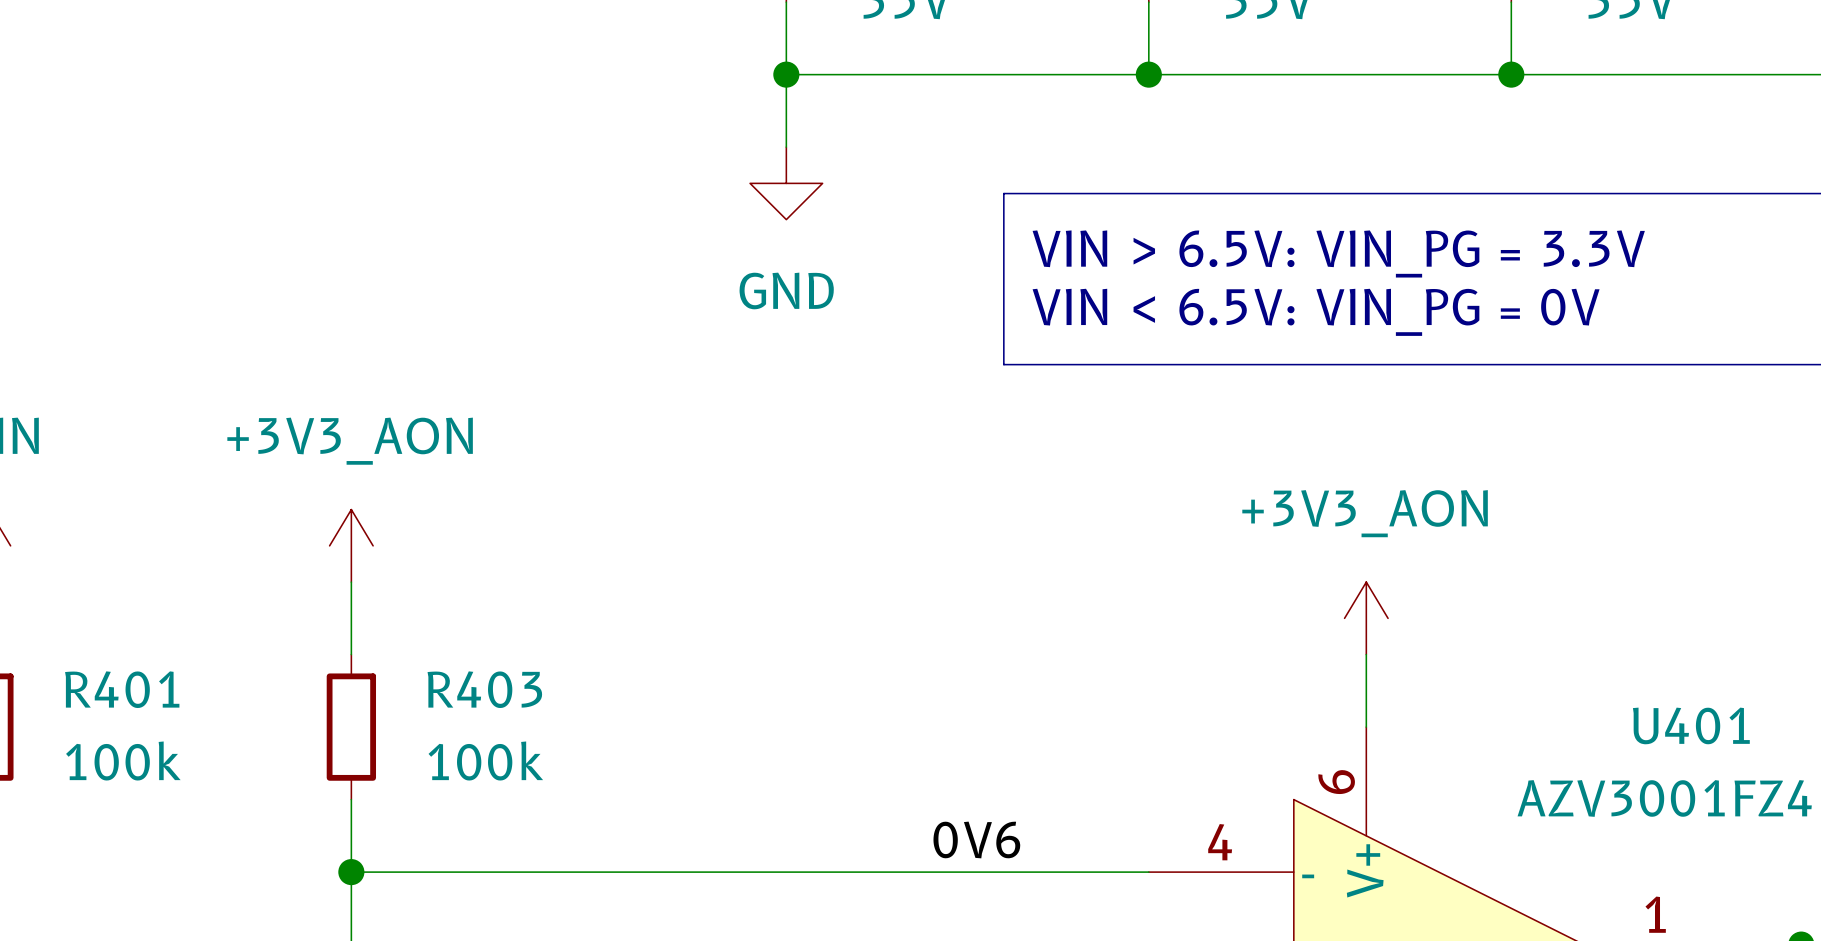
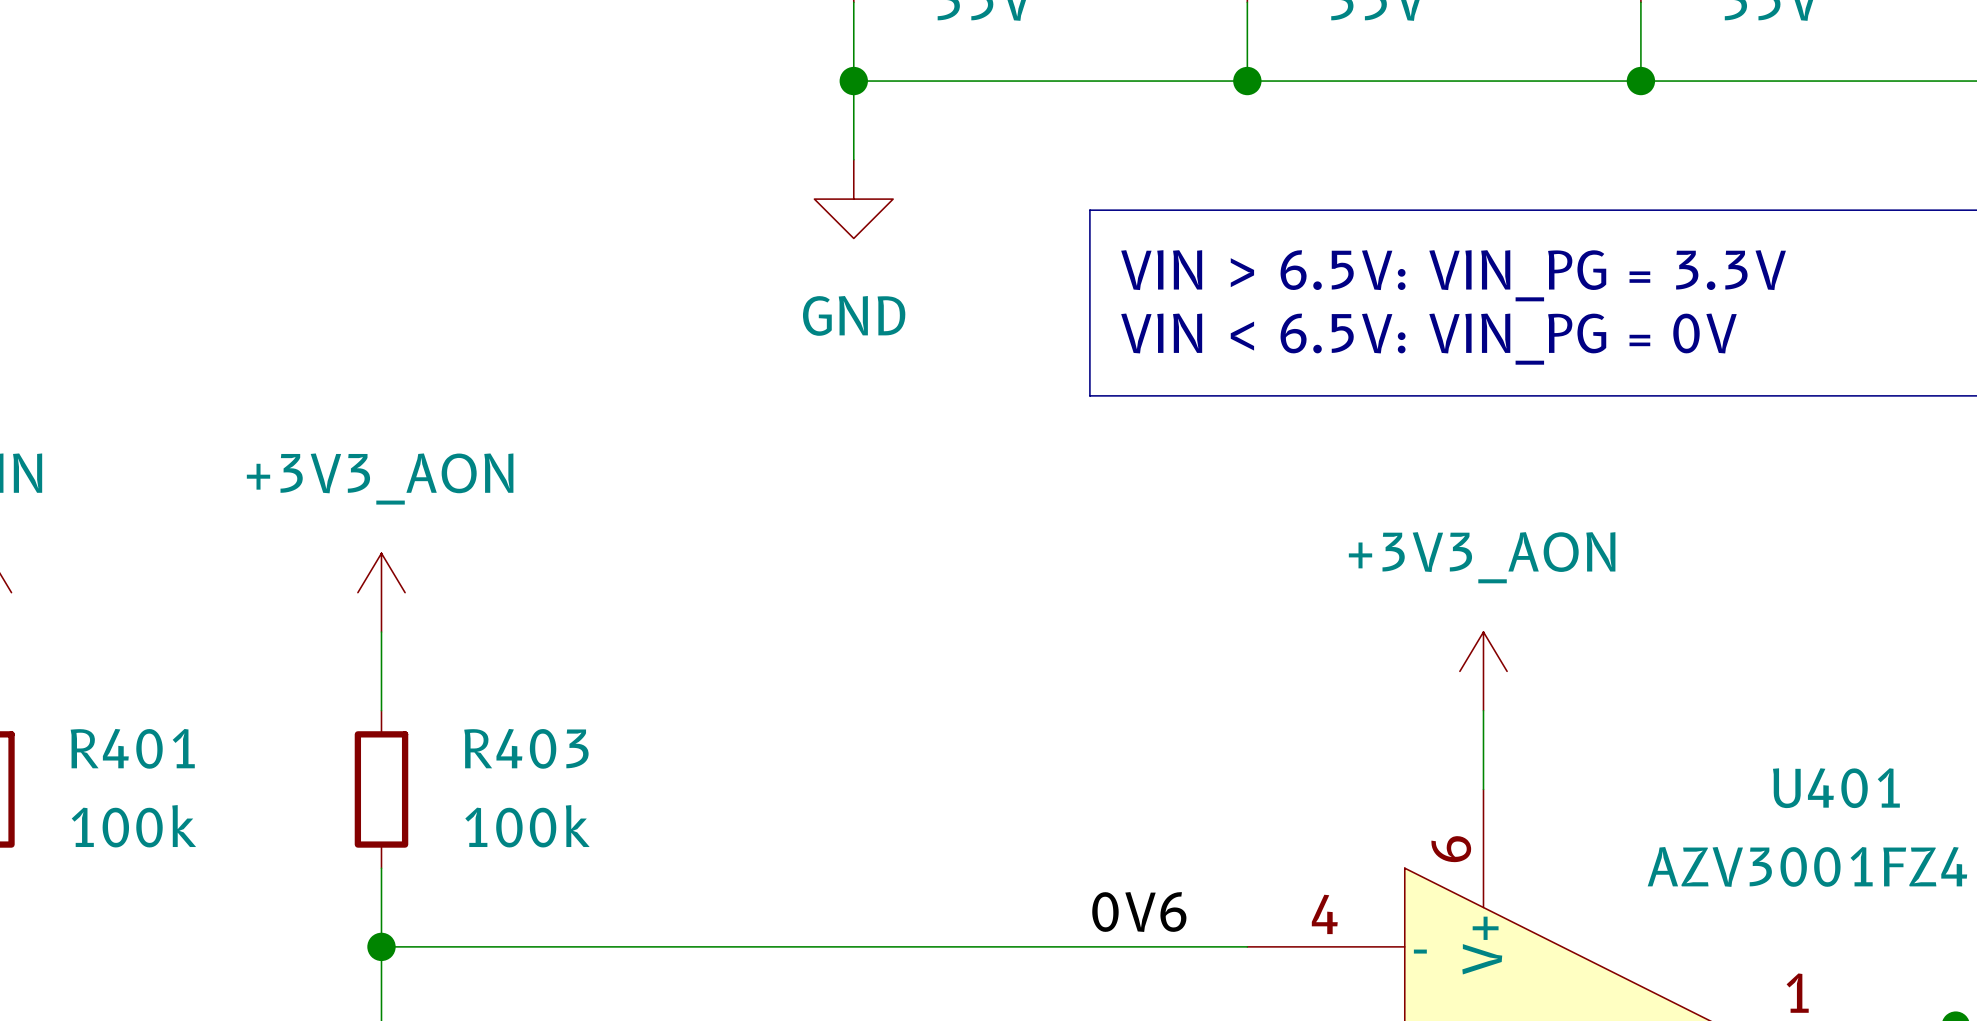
label position: 0V6 (976, 839) -> 0V6 (1139, 912)

